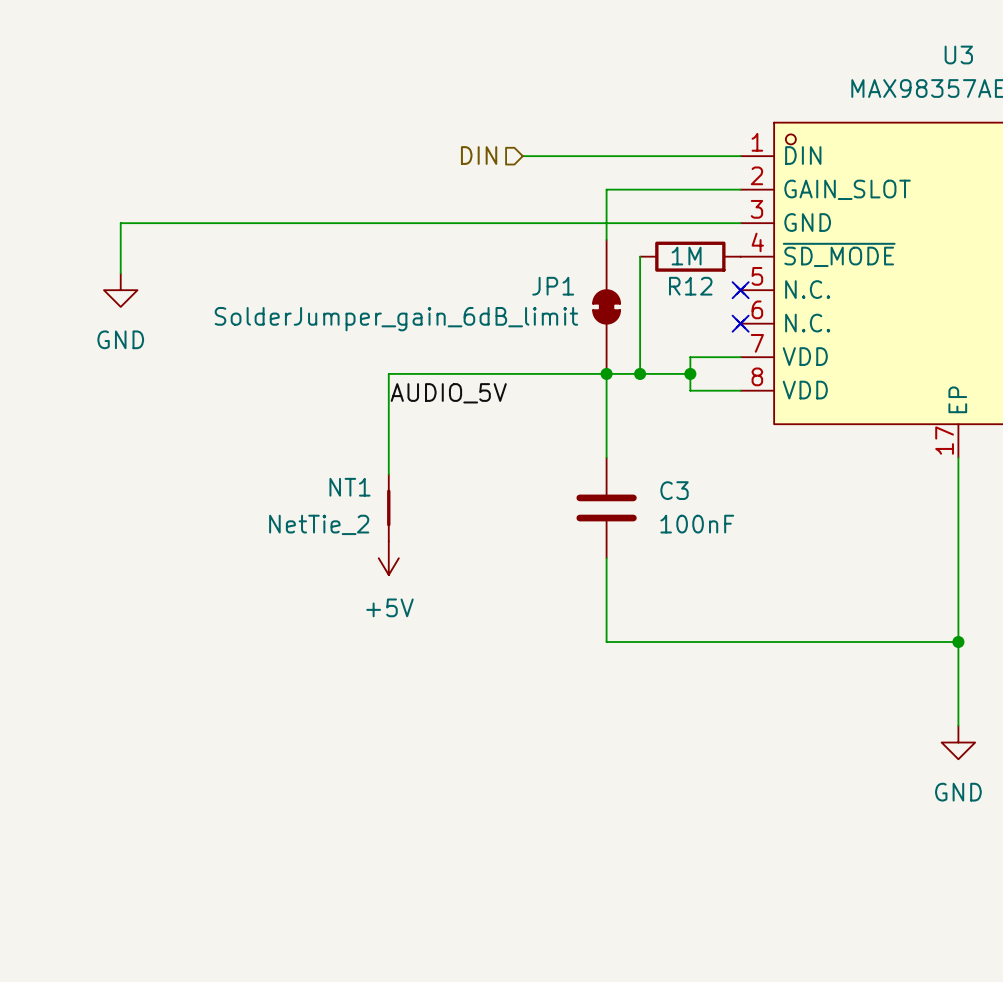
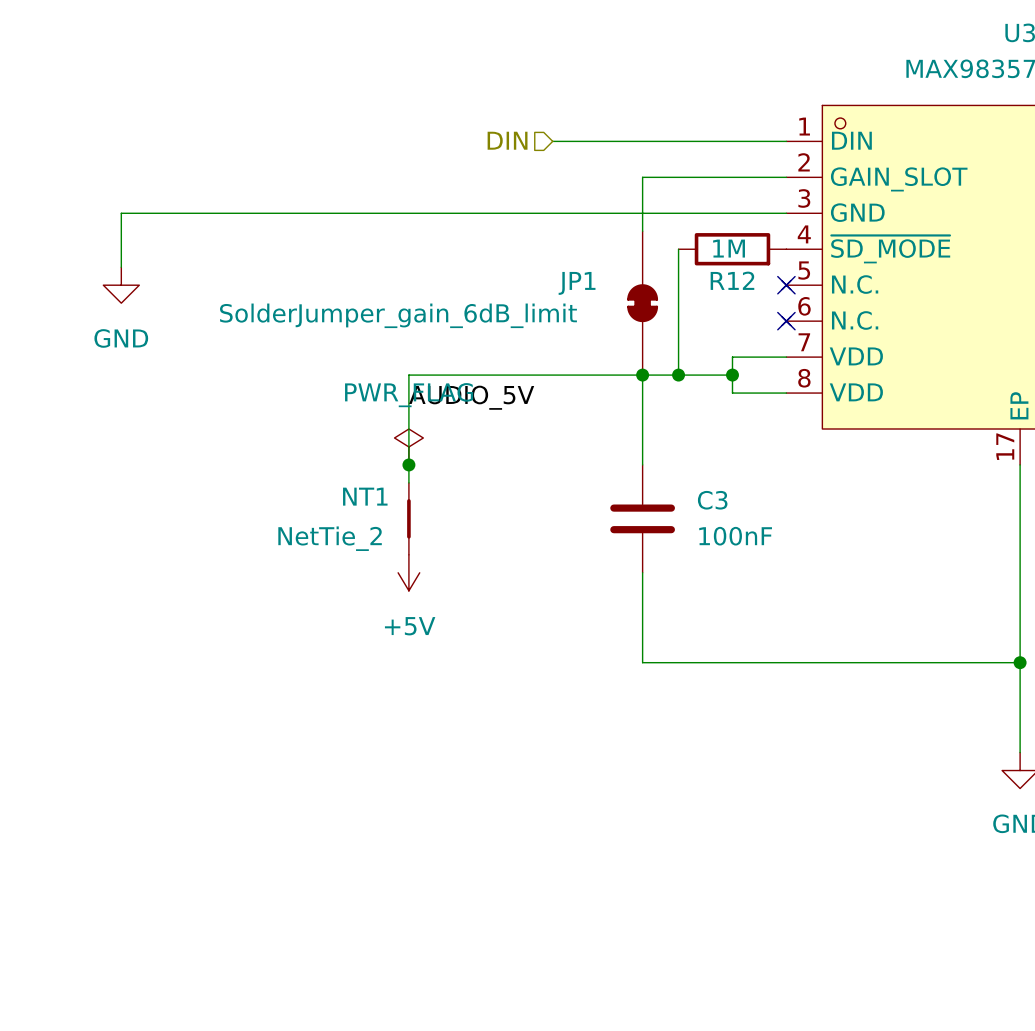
power symbol: none -> PWR_FLAG (408, 446)
junction: none -> (408, 464)

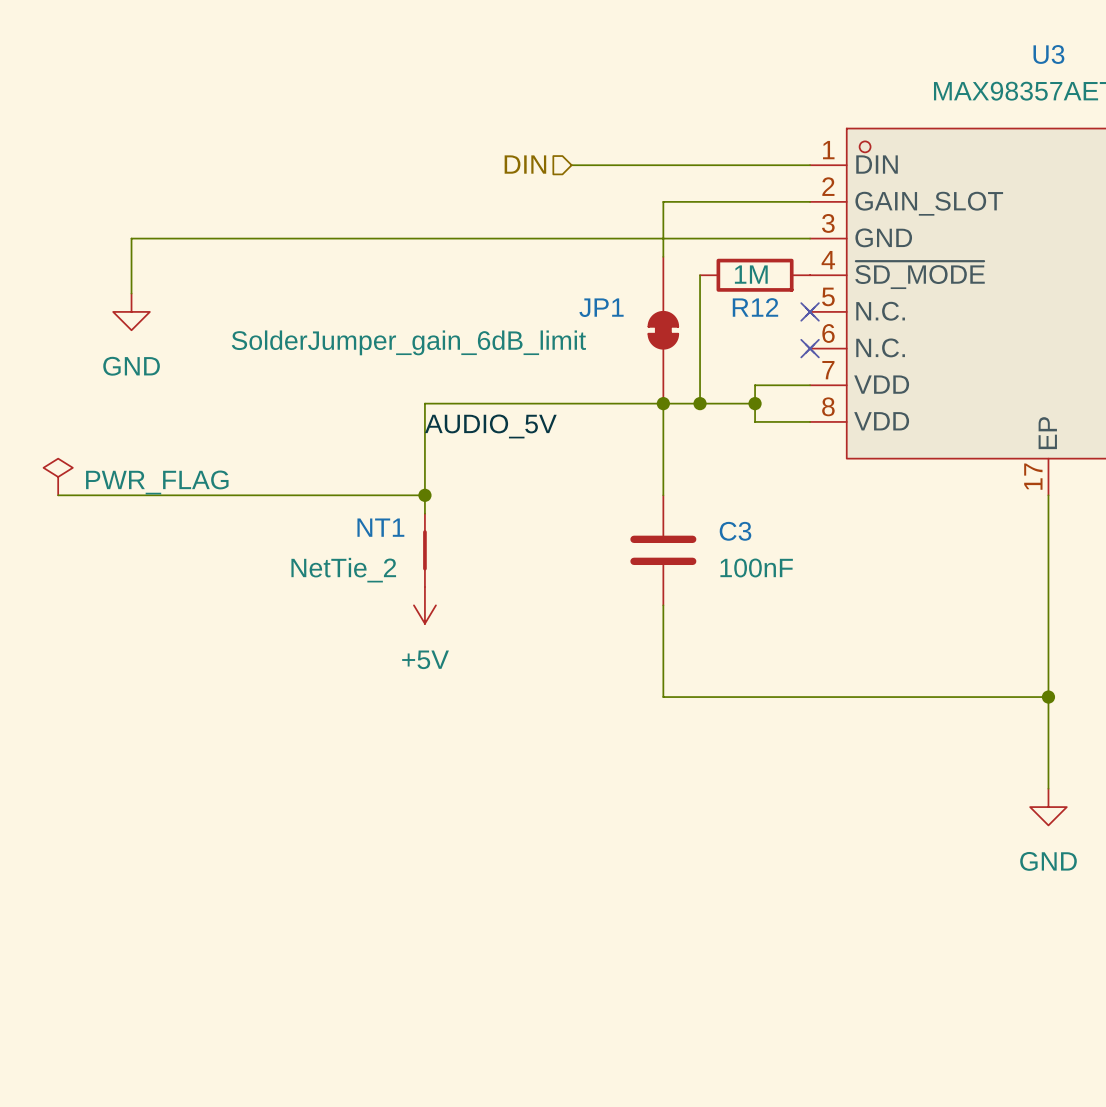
power symbol: none -> PWR_FLAG (58, 476)
power symbol: PWR_FLAG (408, 446) -> none
wire: none -> (58, 495) (424, 495)

